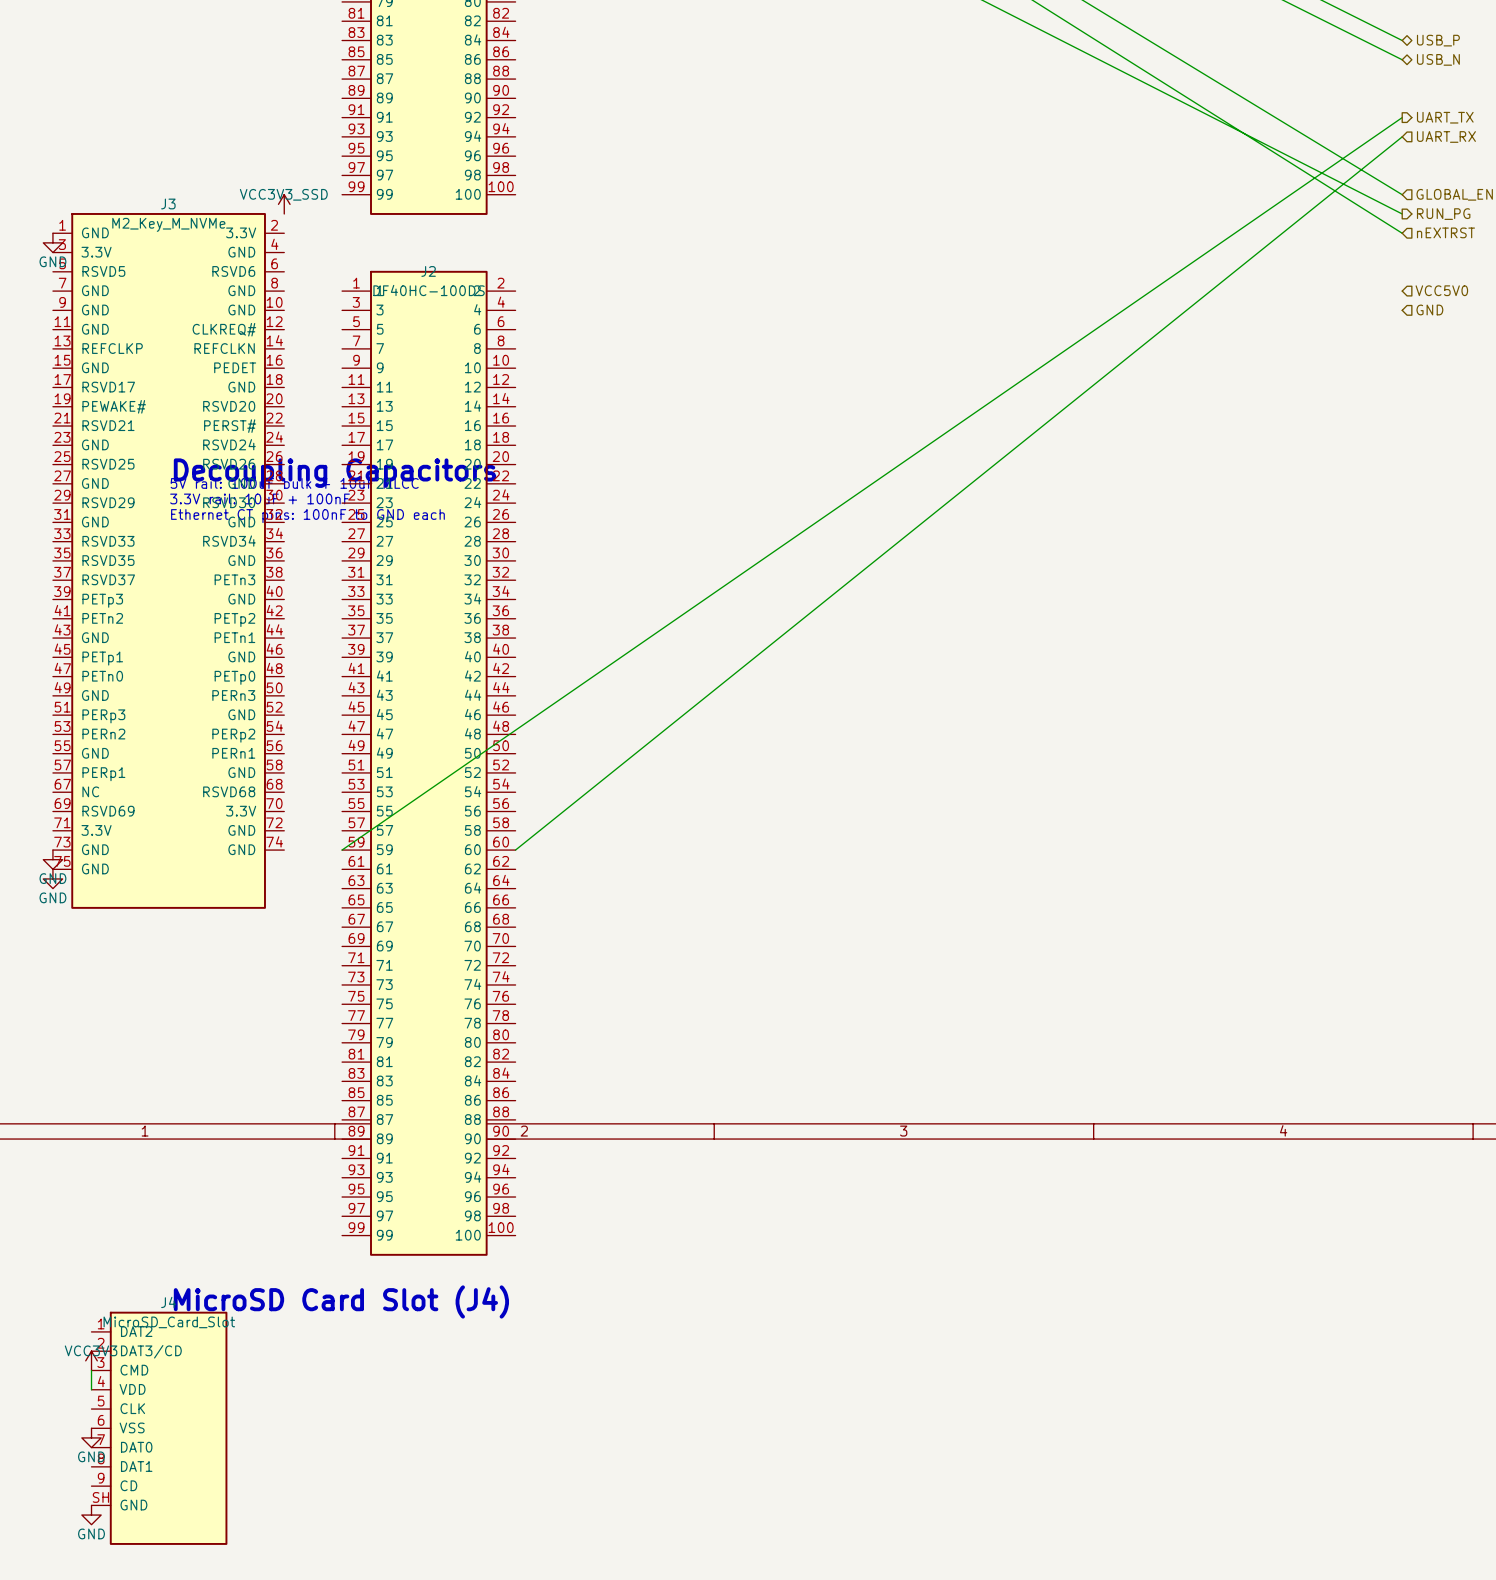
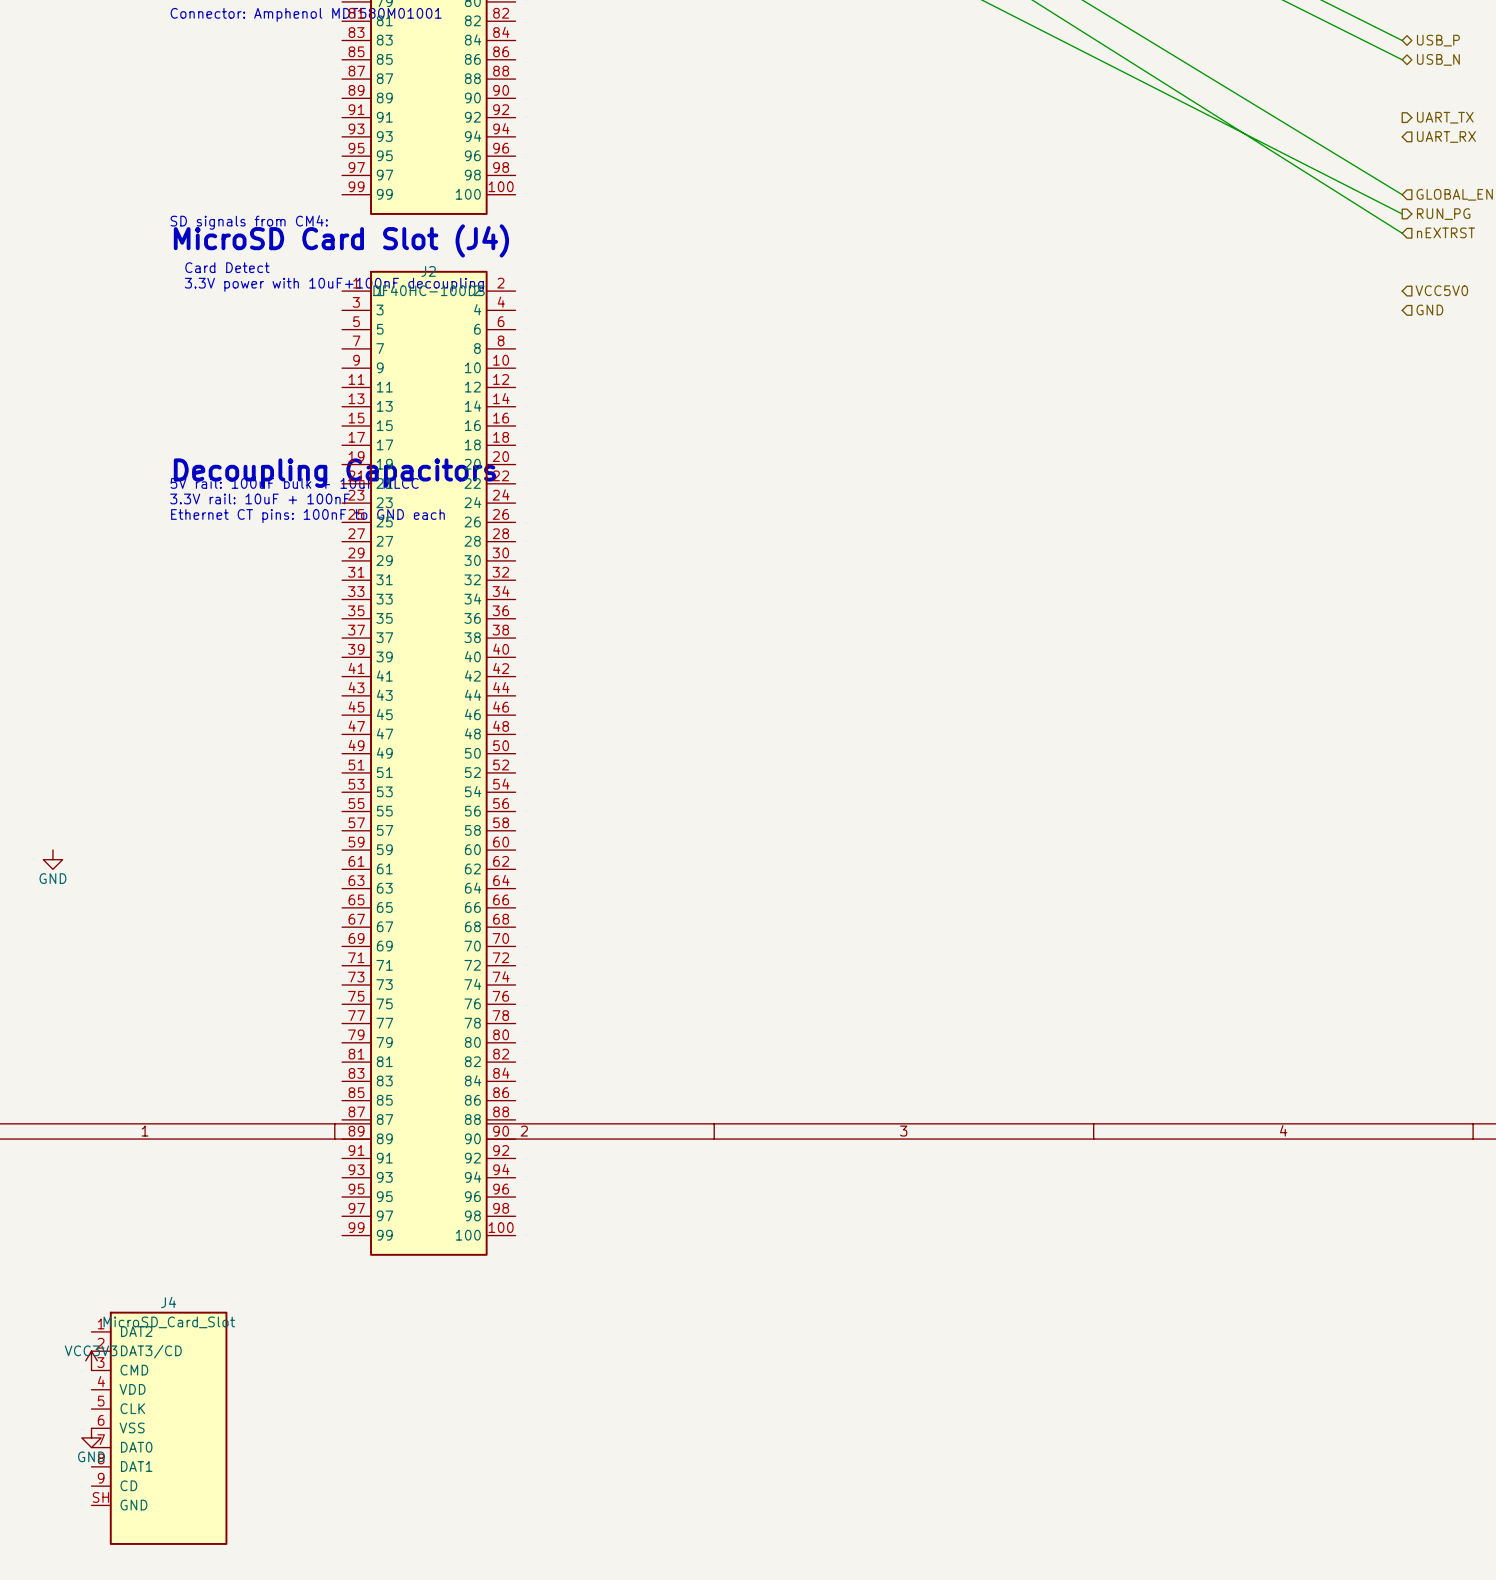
text: none -> Connector: Amphenol MDT580M01001 (306, 14)
wire: (1402, 117) (342, 850) -> none
wire: (1402, 136) (515, 850) -> none
power symbol: VCC3V3_SSD (284, 204) -> none
text: none -> SD signals from CM4: (249, 222)
text: none -> MicroSD Card Slot (J4) (341, 240)
power symbol: GND (52, 242) -> none
text: none -> Card Detect (227, 267)
text: none -> 3.3V power with 10uF+100nF decoupling (334, 284)
J3: M2_Key_M_NVMe (168, 560) -> none
power symbol: GND (52, 878) -> none
text: MicroSD Card Slot (J4) (341, 1301) -> none
wire: (91, 1370) (91, 1389) -> none
power symbol: GND (91, 1515) -> none

